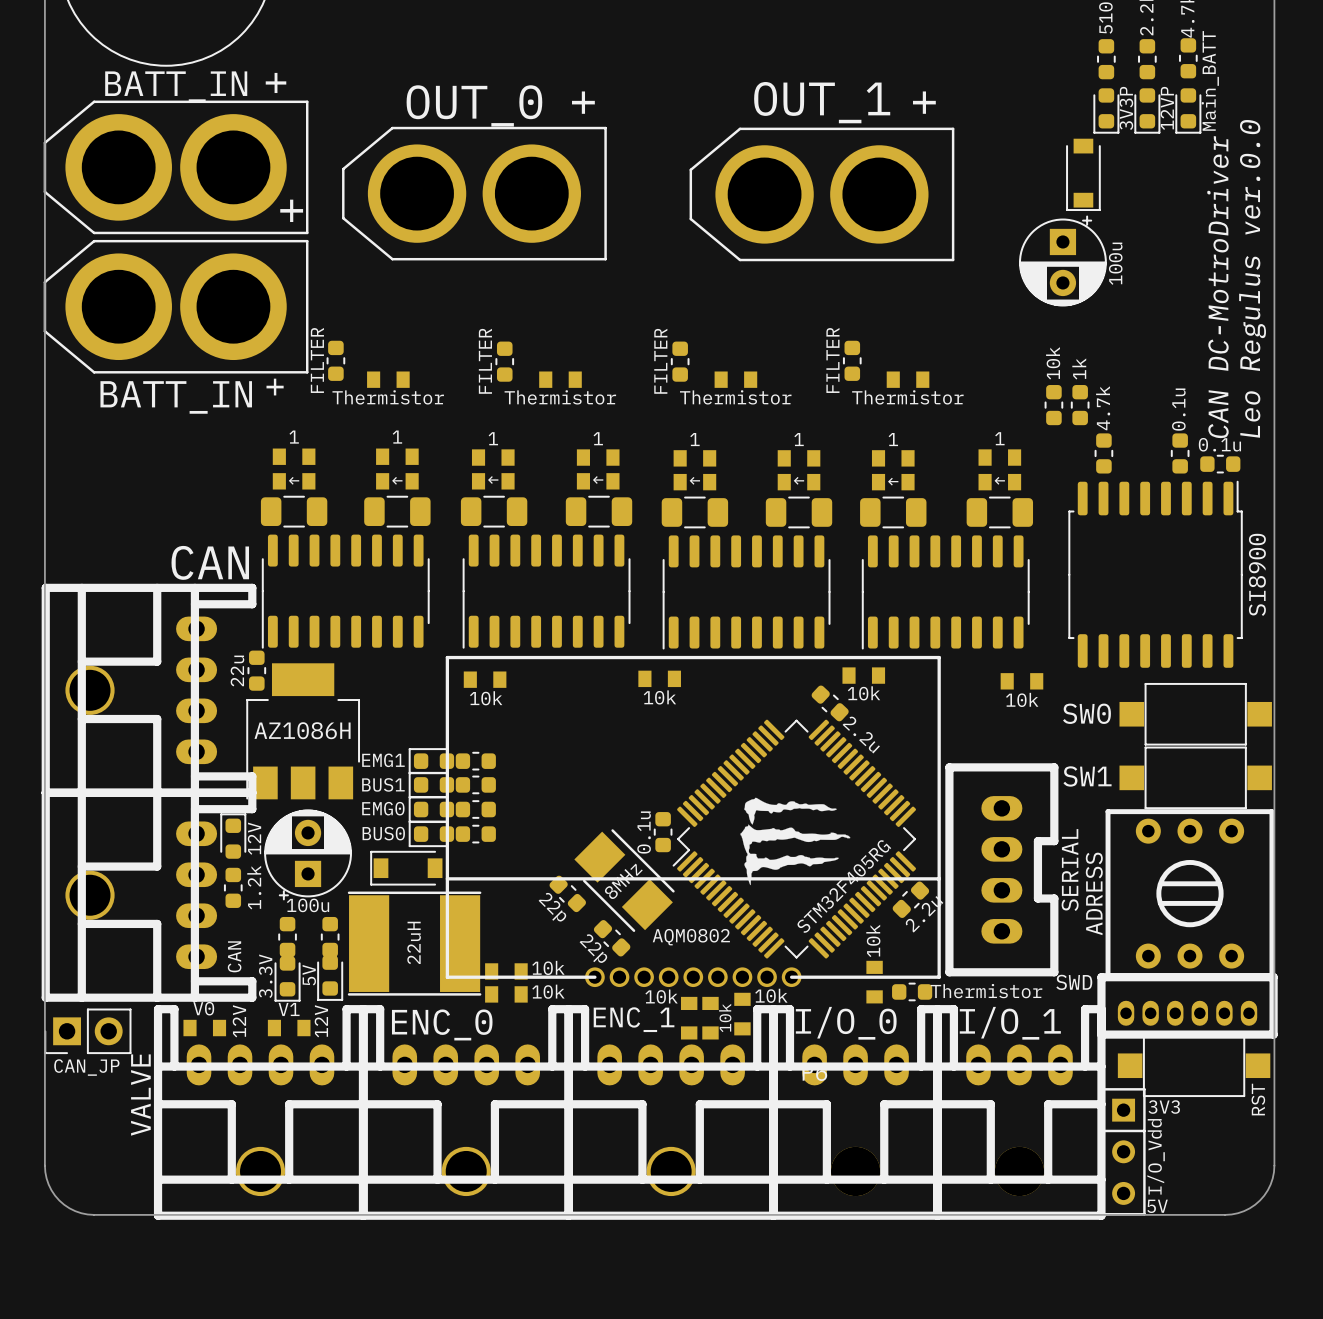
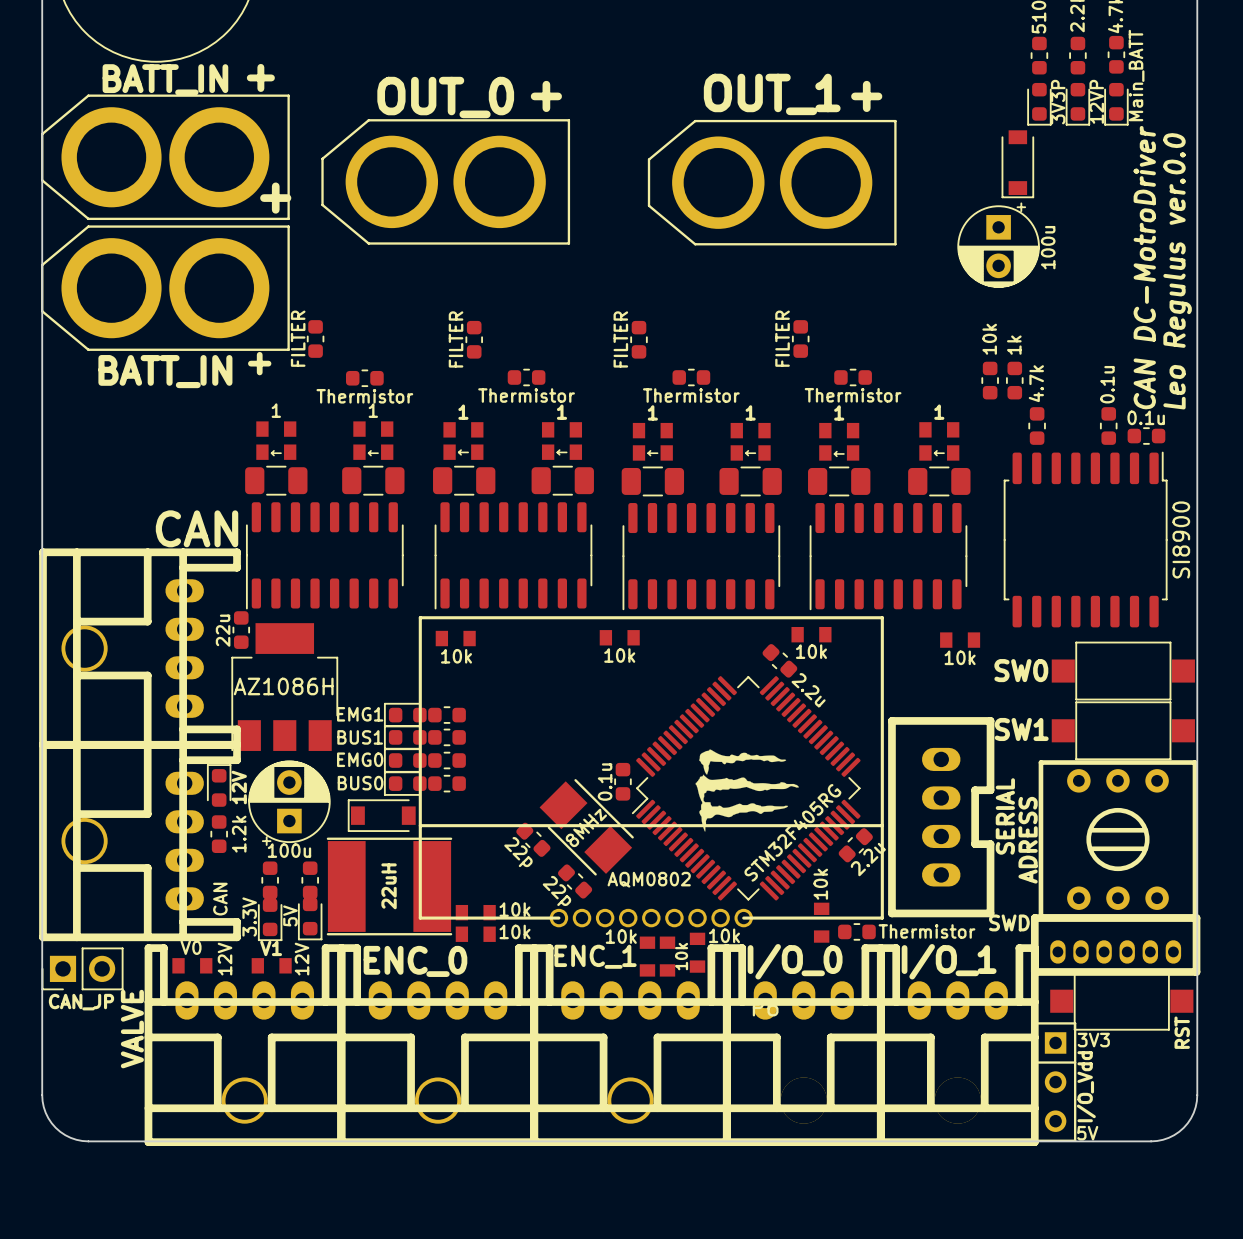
part: Thermistor (388, 379) -> none
part: Thermistor (560, 379) -> none
part: Thermistor (735, 379) -> none
part: Thermistor (908, 379) -> none
part: none -> Thermistor (526, 377)
part: none -> Thermistor (691, 377)
part: none -> Thermistor (853, 377)
part: none -> Thermistor (364, 378)

